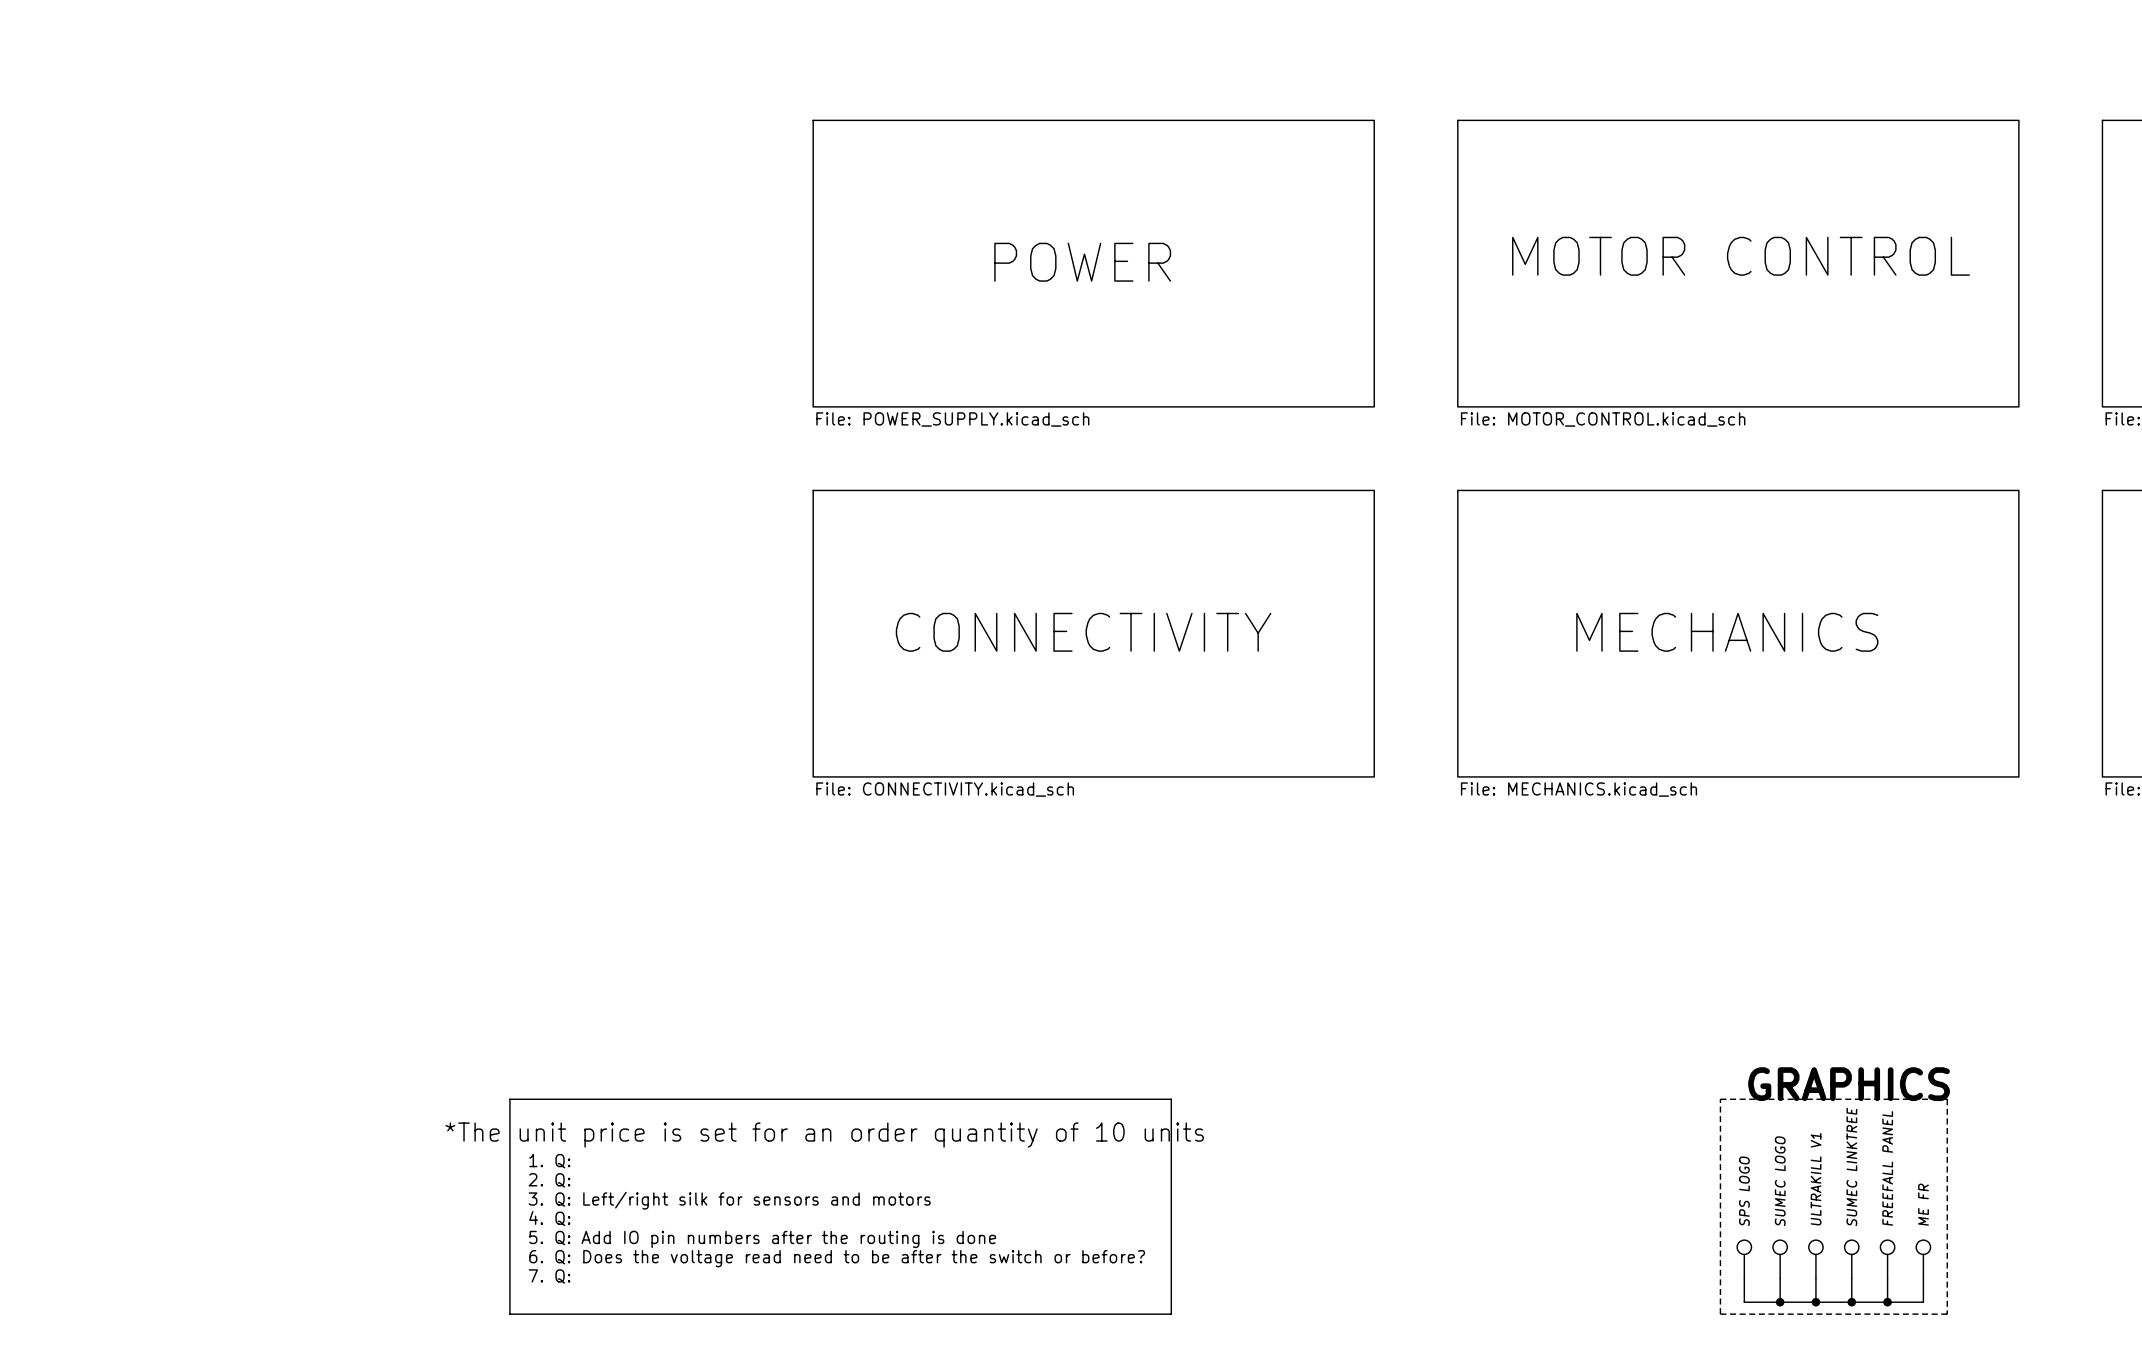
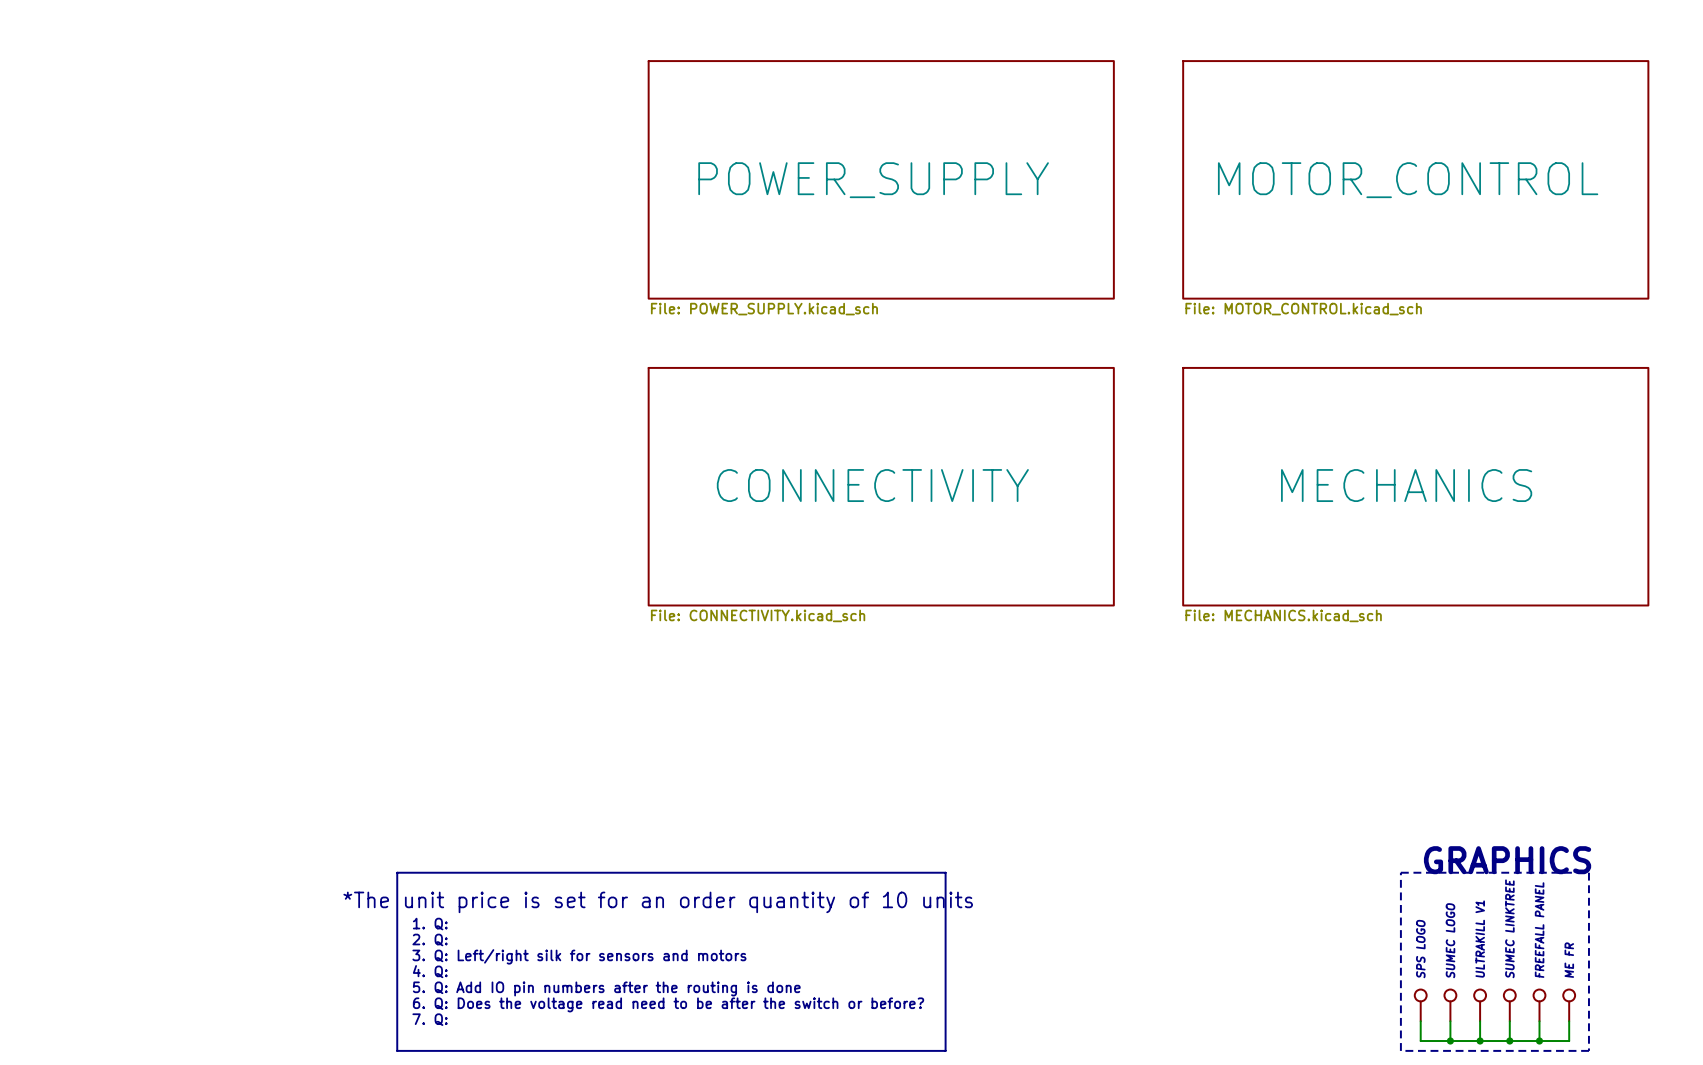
sheet MOTOR CONTROL name: MOTOR CONTROL (1741, 256) -> MOTOR_CONTROL (1408, 180)
sheet POWER name: POWER (1082, 262) -> POWER_SUPPLY (873, 180)

